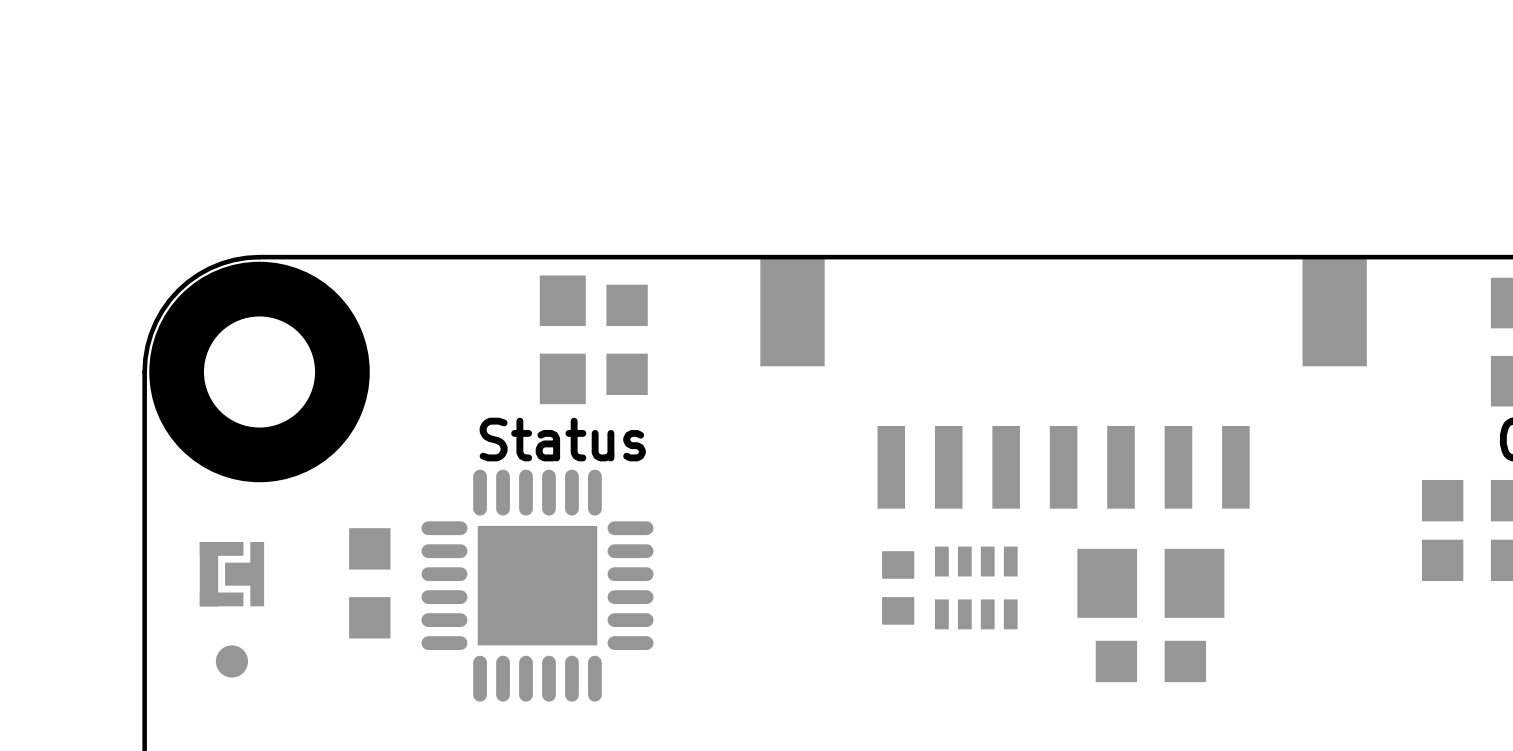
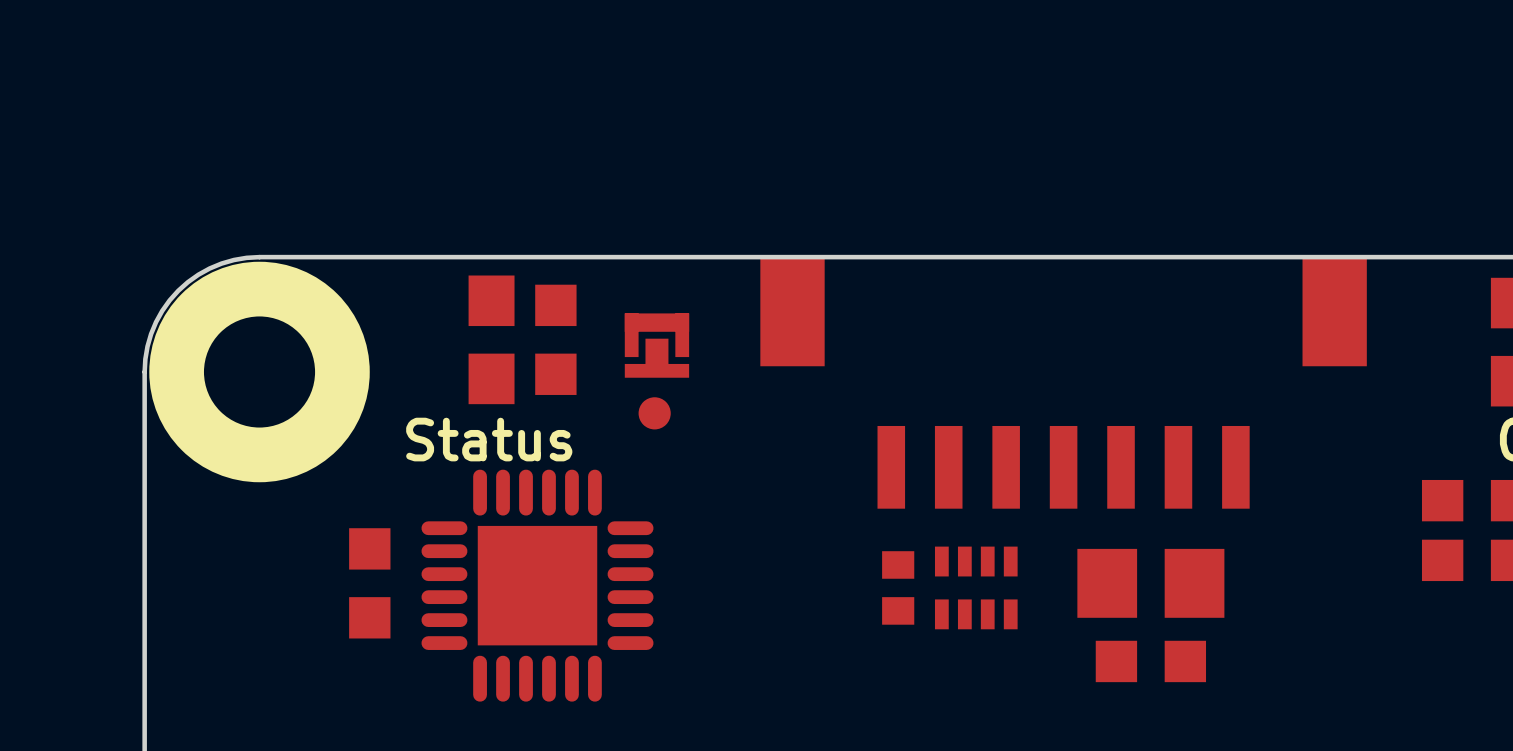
part footprint: [539, 275, 586, 405] -> [535, 284, 577, 395]
part footprint: [606, 284, 648, 395] -> [624, 313, 690, 378]
part: none -> (491, 339)
text position: Status (562, 439) -> Status (489, 439)
part: (231, 574) -> none
part position: (231, 661) -> (654, 413)

